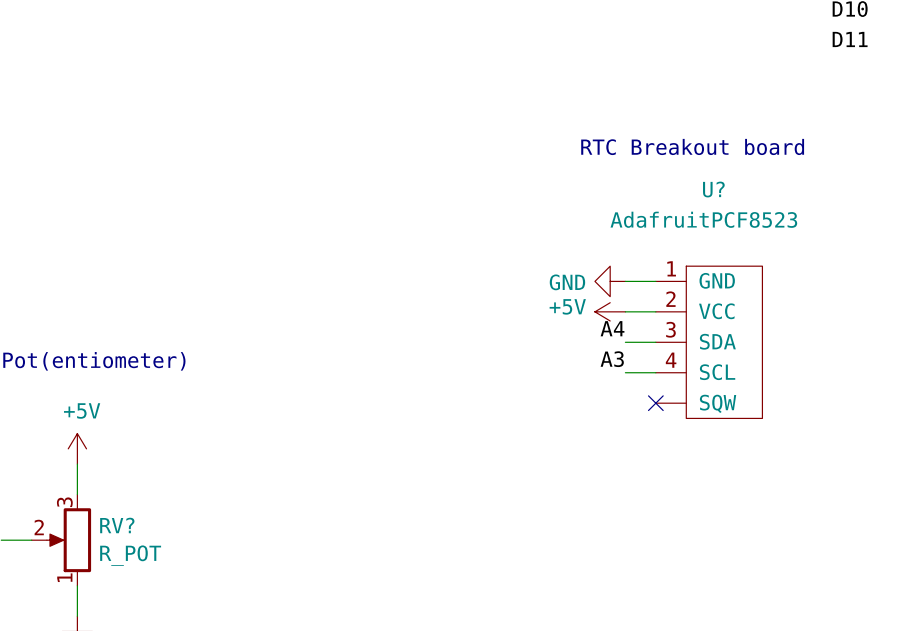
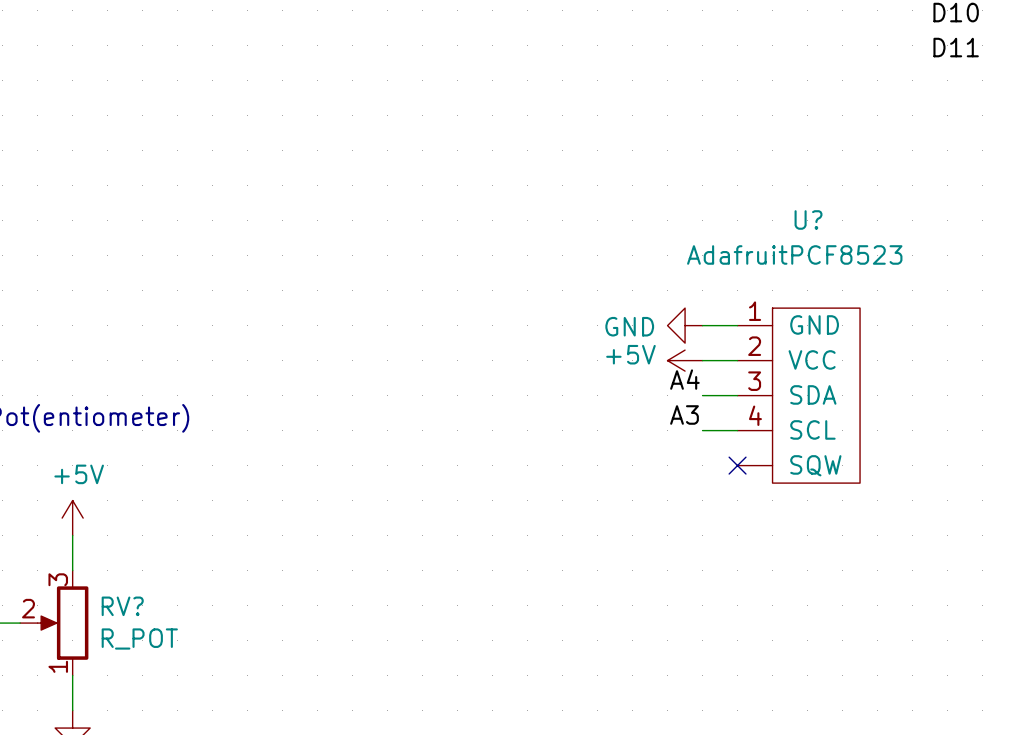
text: RTC Breakout board (692, 146) -> none

